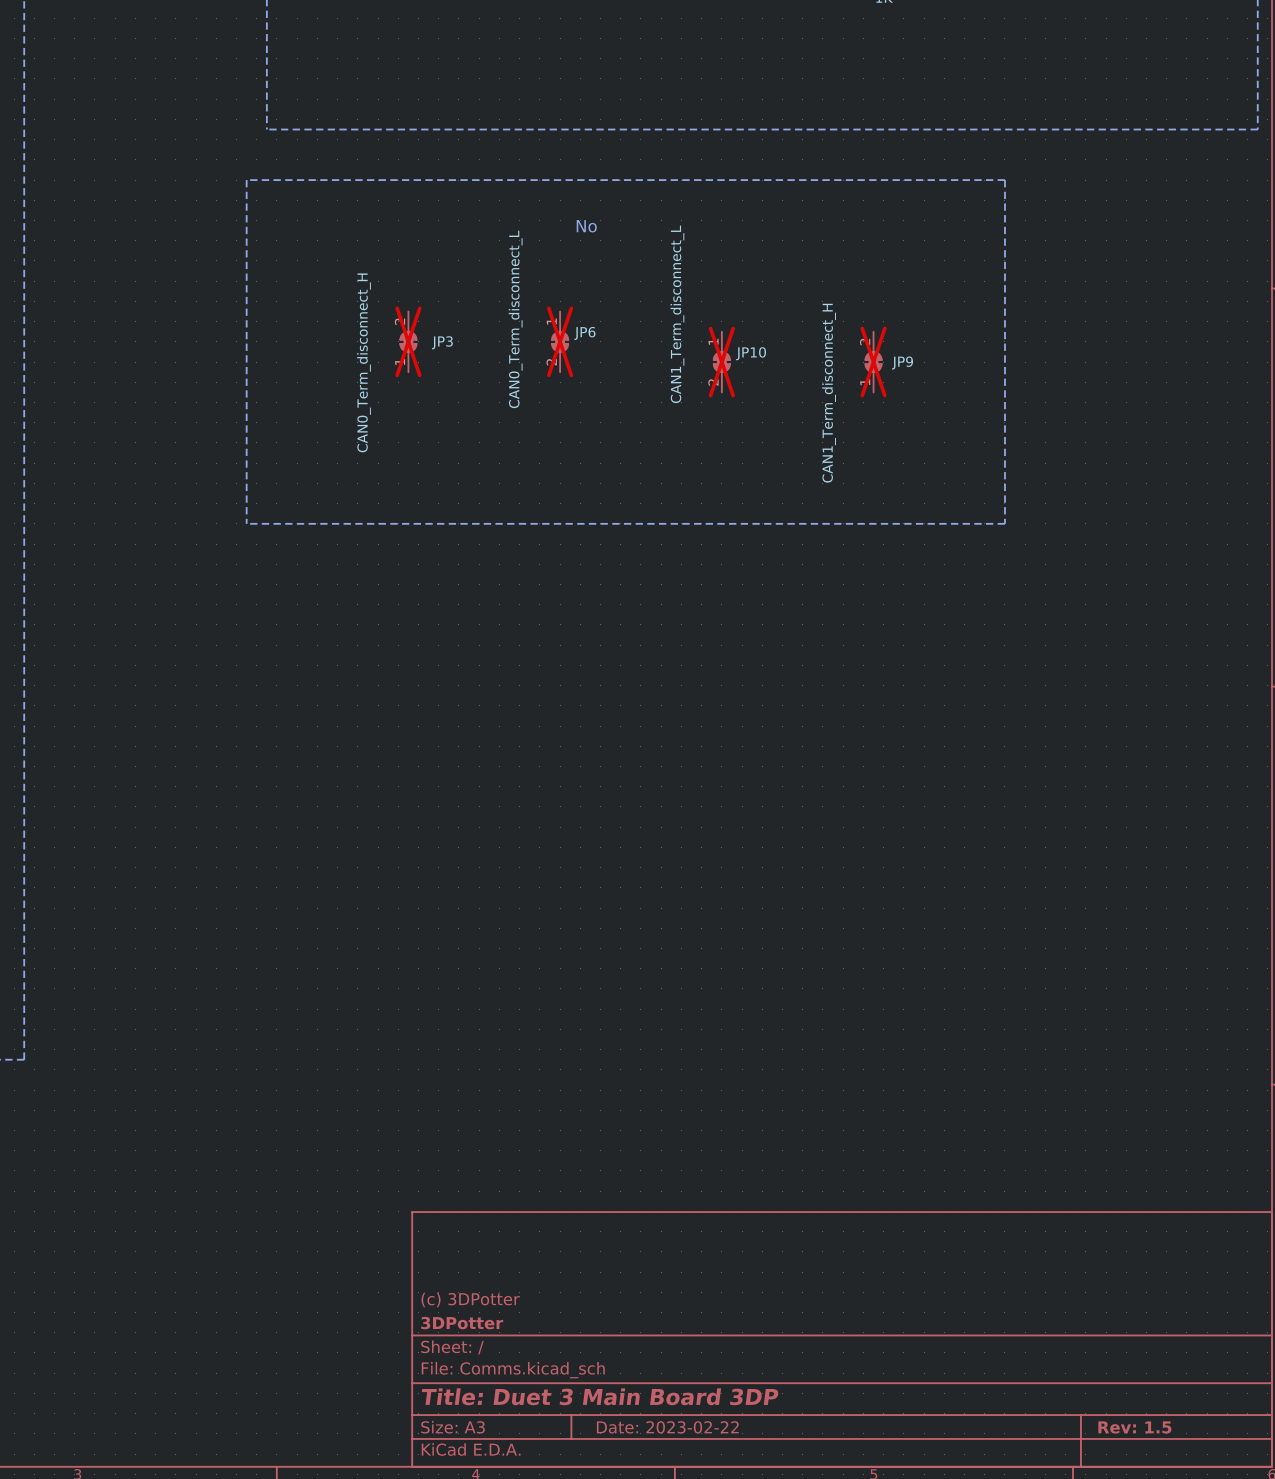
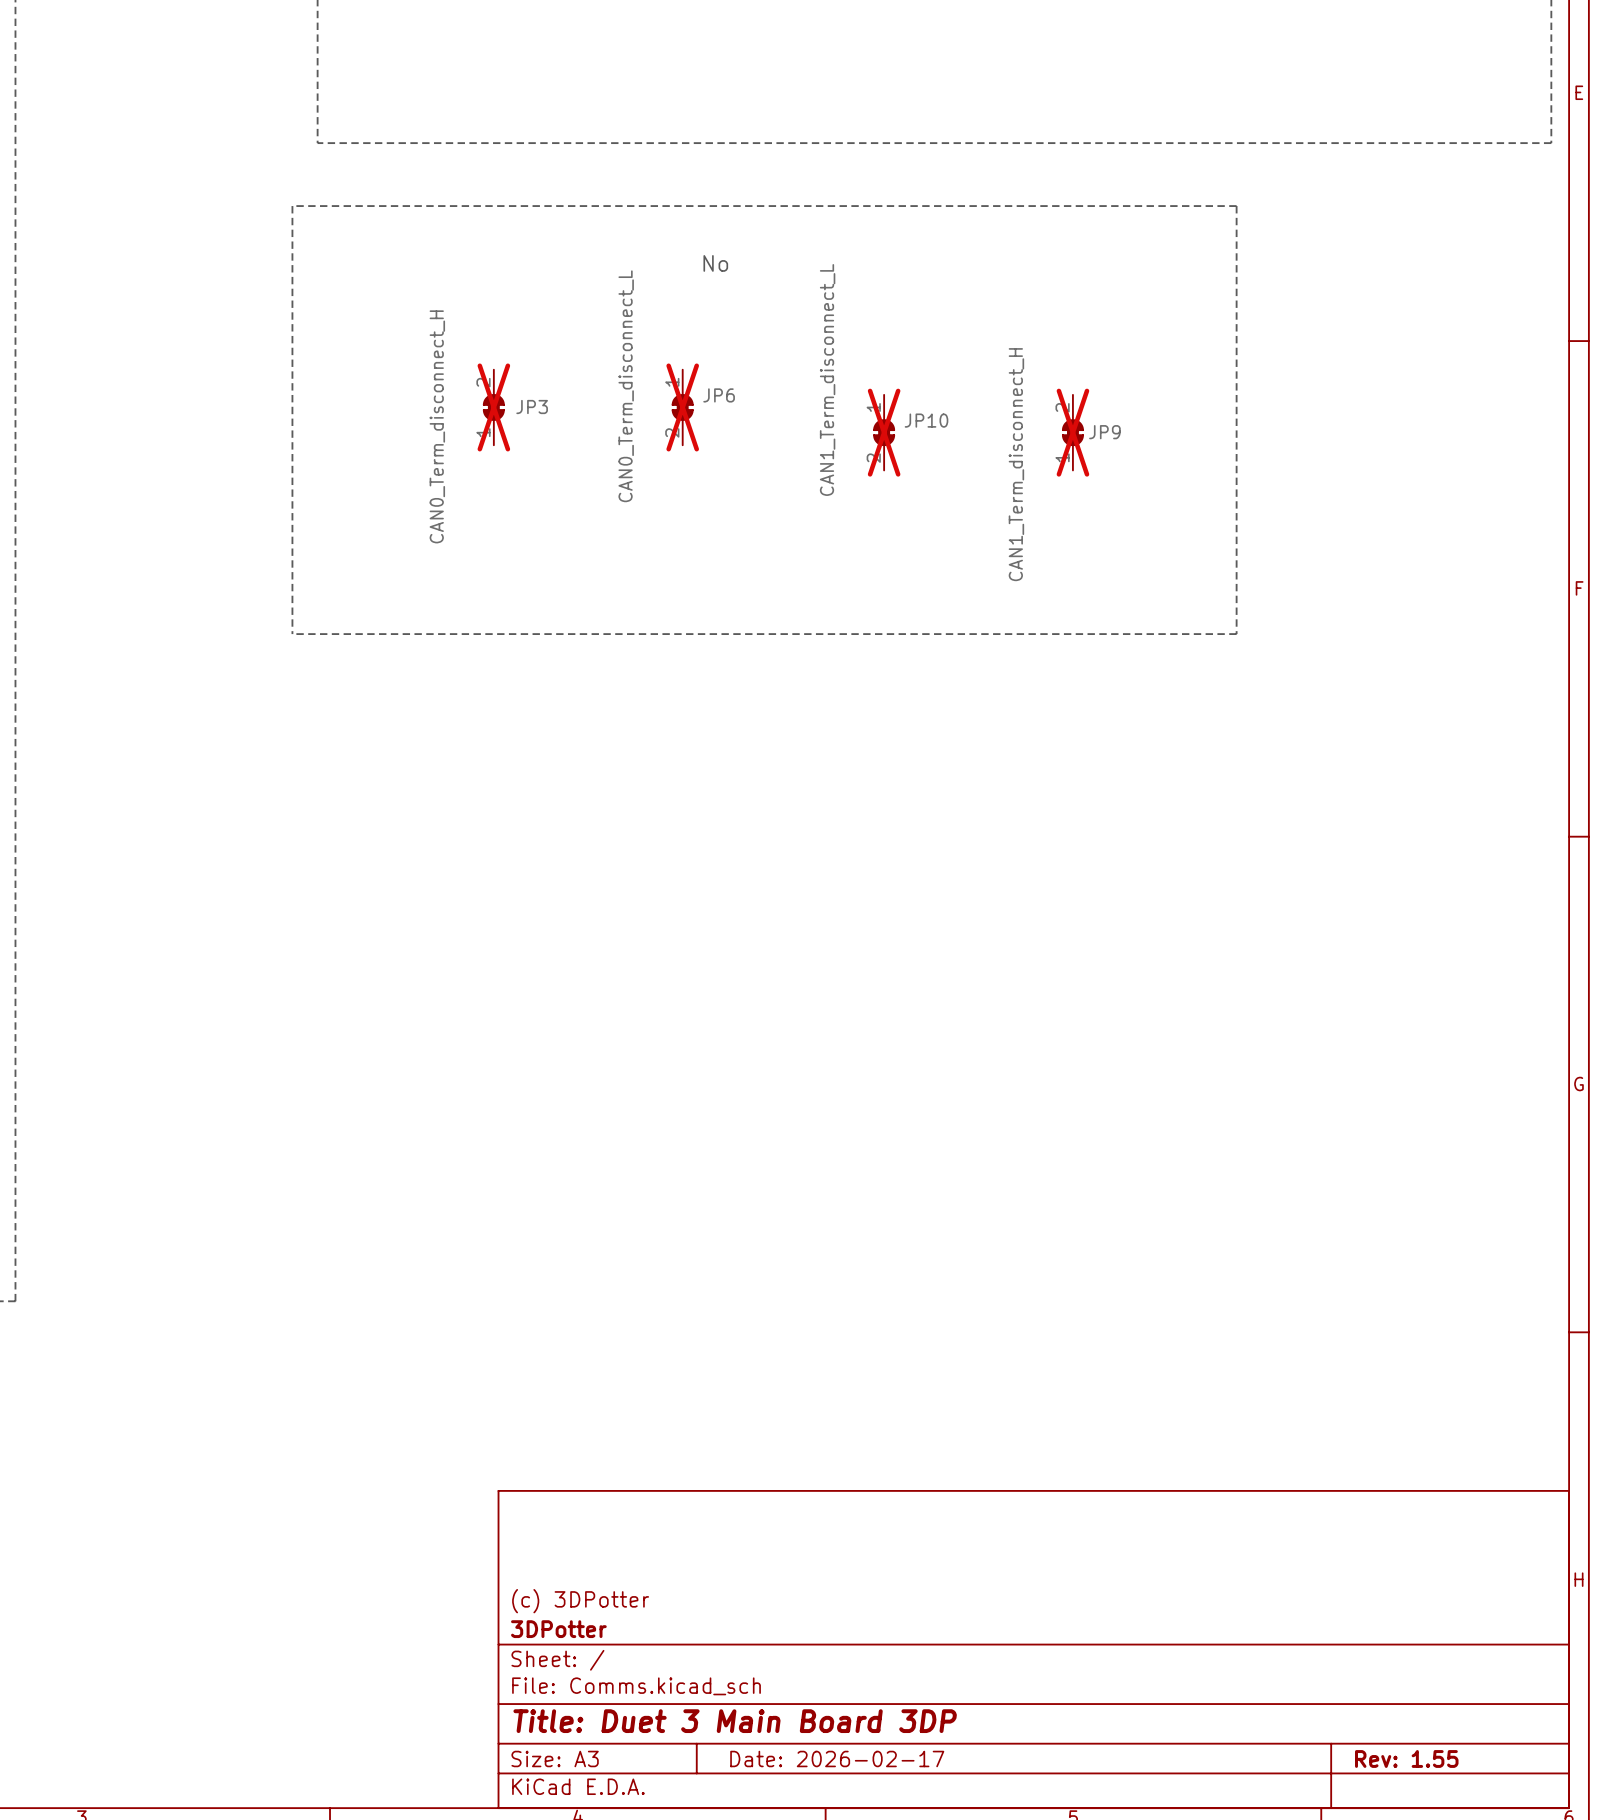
title block: Date: 2023-02-22 (667, 1427) -> Date: 2026-02-17 (837, 1758)
title block: Rev: 1.5 (1134, 1427) -> Rev: 1.55 (1406, 1758)

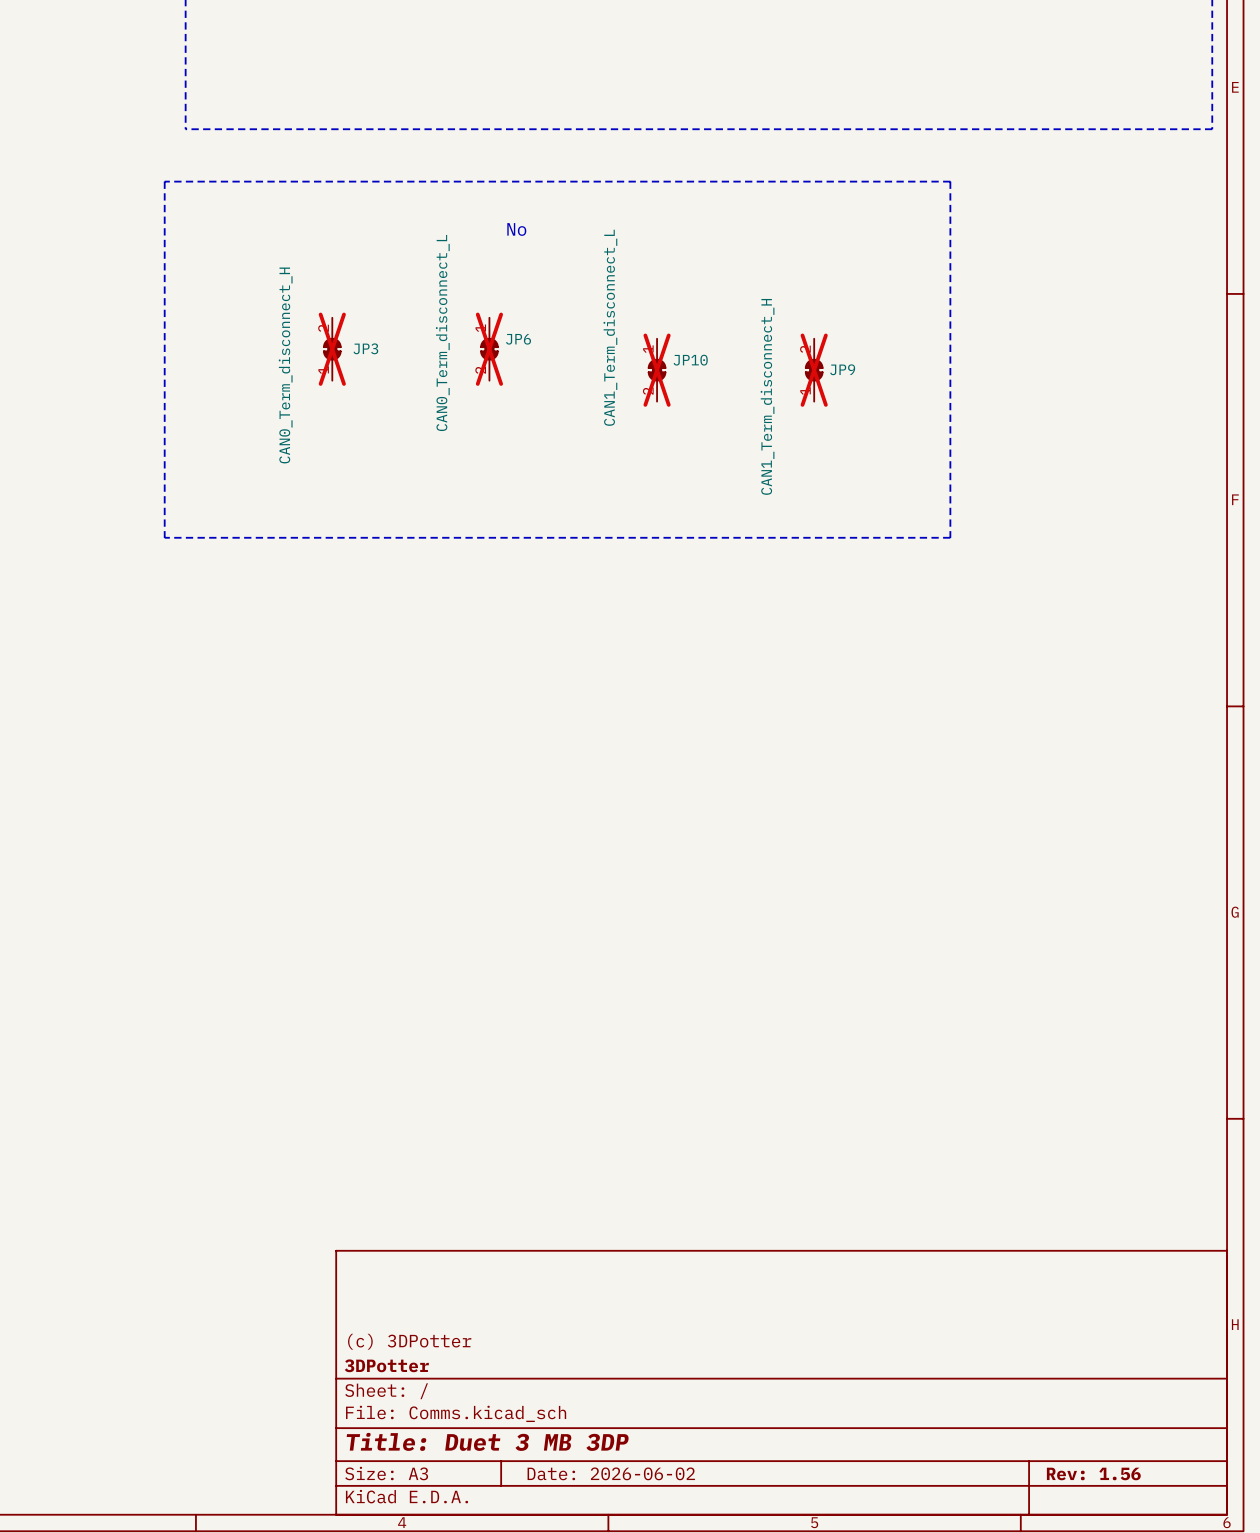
title block: Title: Duet 3 Main Board 3DP (735, 1721) -> Title: Duet 3 MB 3DP (487, 1441)
title block: Date: 2026-02-17 (837, 1758) -> Date: 2026-06-02 (611, 1473)
title block: Rev: 1.55 (1406, 1758) -> Rev: 1.56 (1093, 1473)

